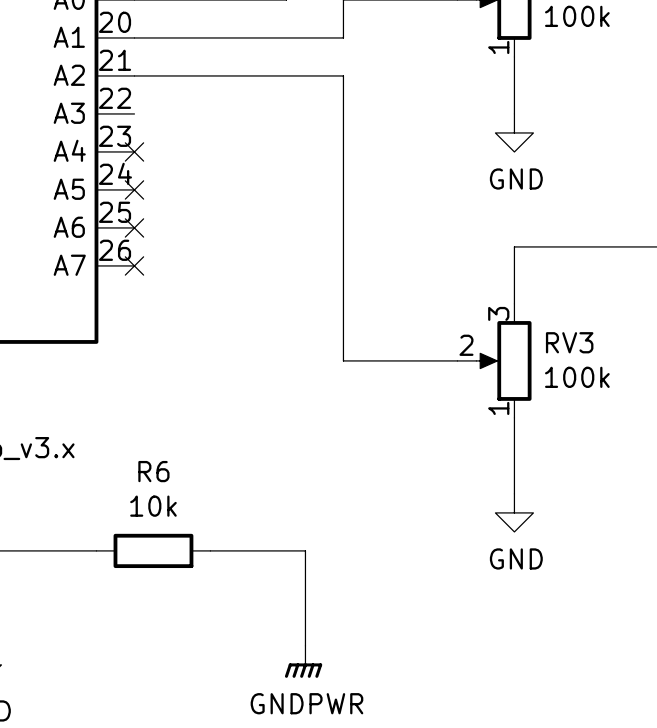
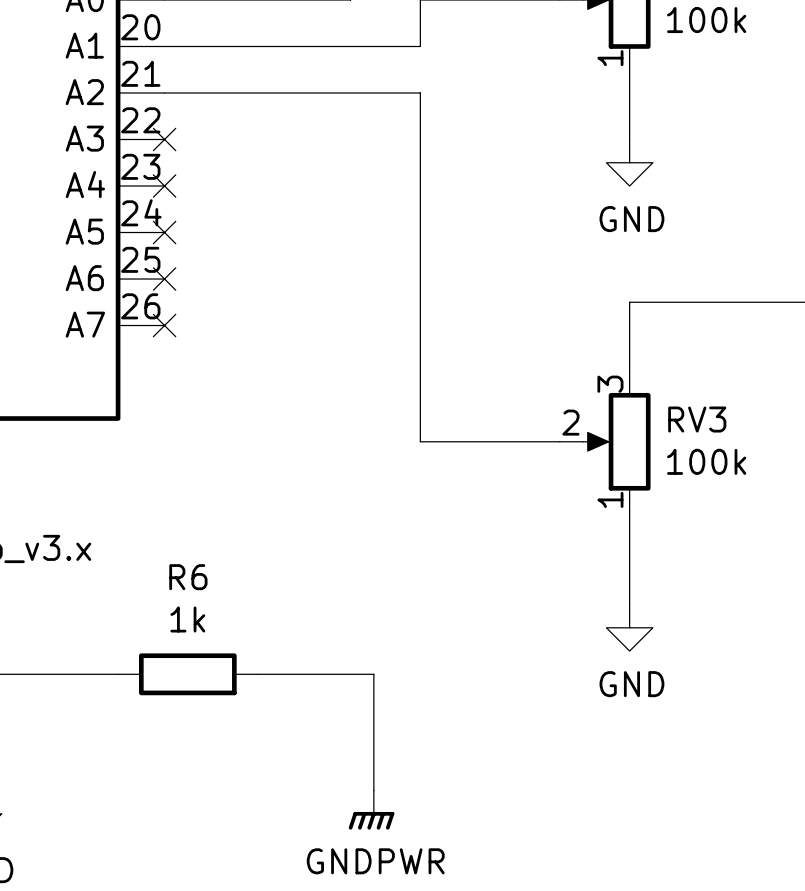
no-connect mark: none -> (164, 139)
R6 value: 10k (153, 506) -> 1k (187, 619)

